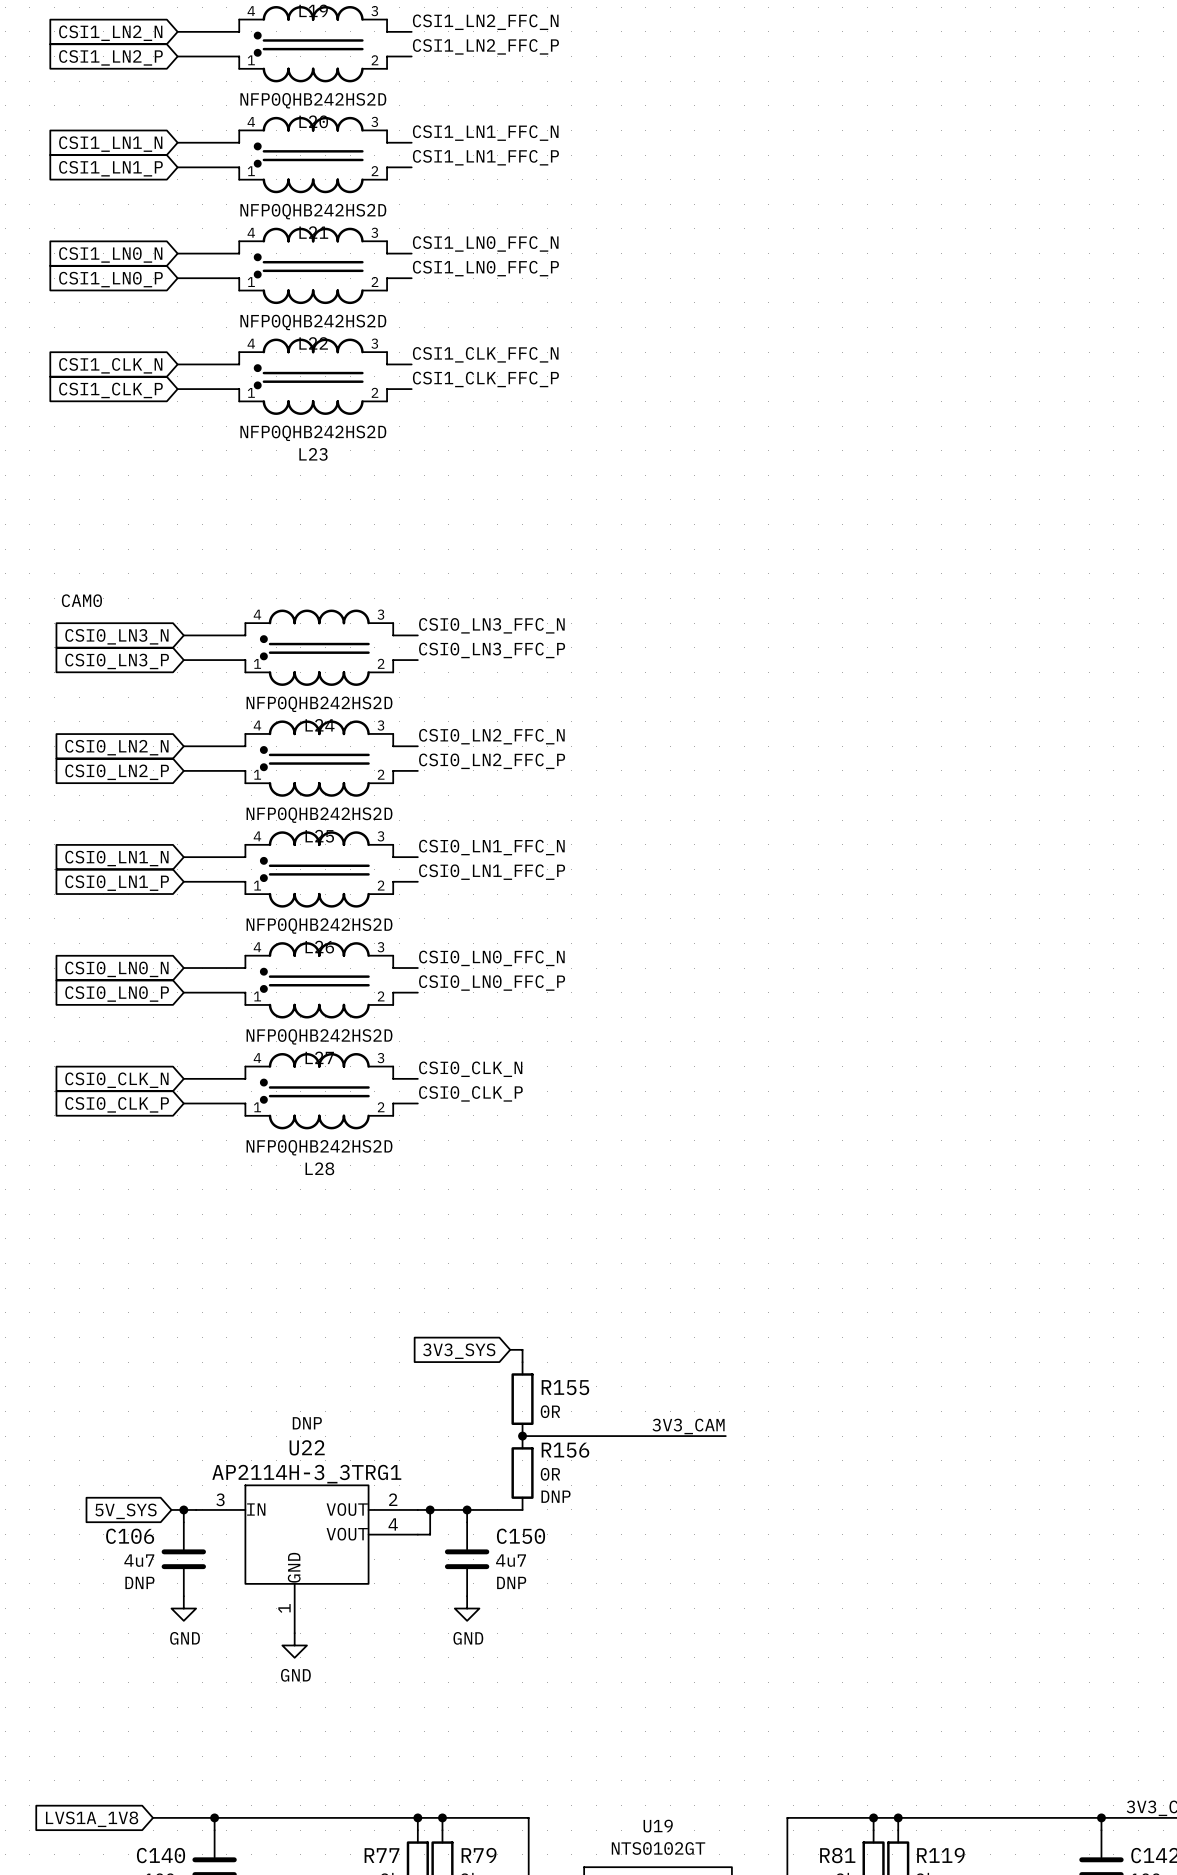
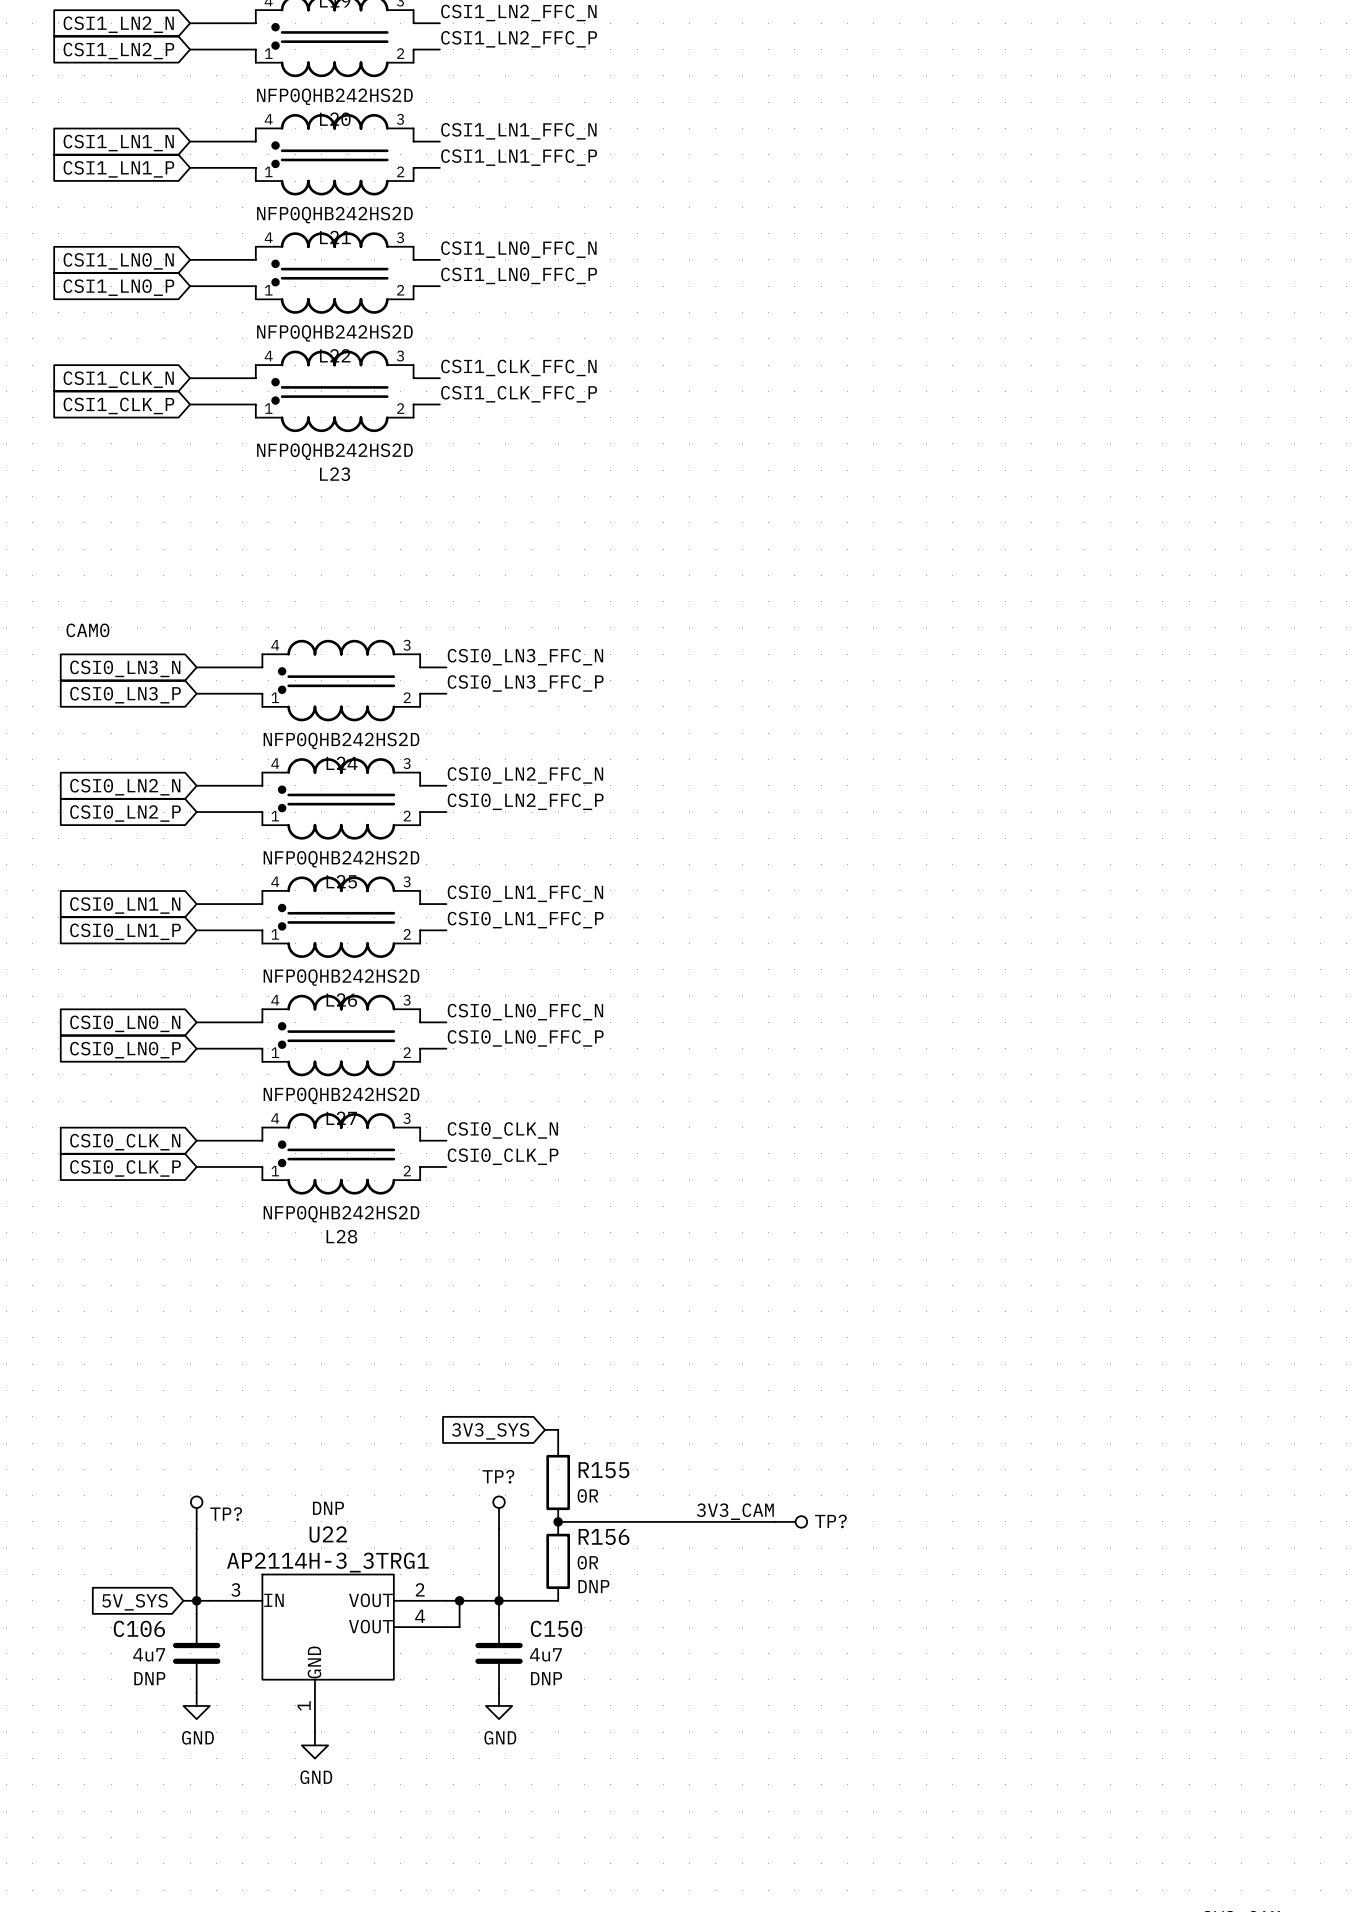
TP?: none -> (196, 1512)
TP?: none -> (499, 1512)
TP?: none -> (791, 1521)
wire: none -> (196, 1528) (196, 1600)
wire: none -> (499, 1528) (499, 1600)

